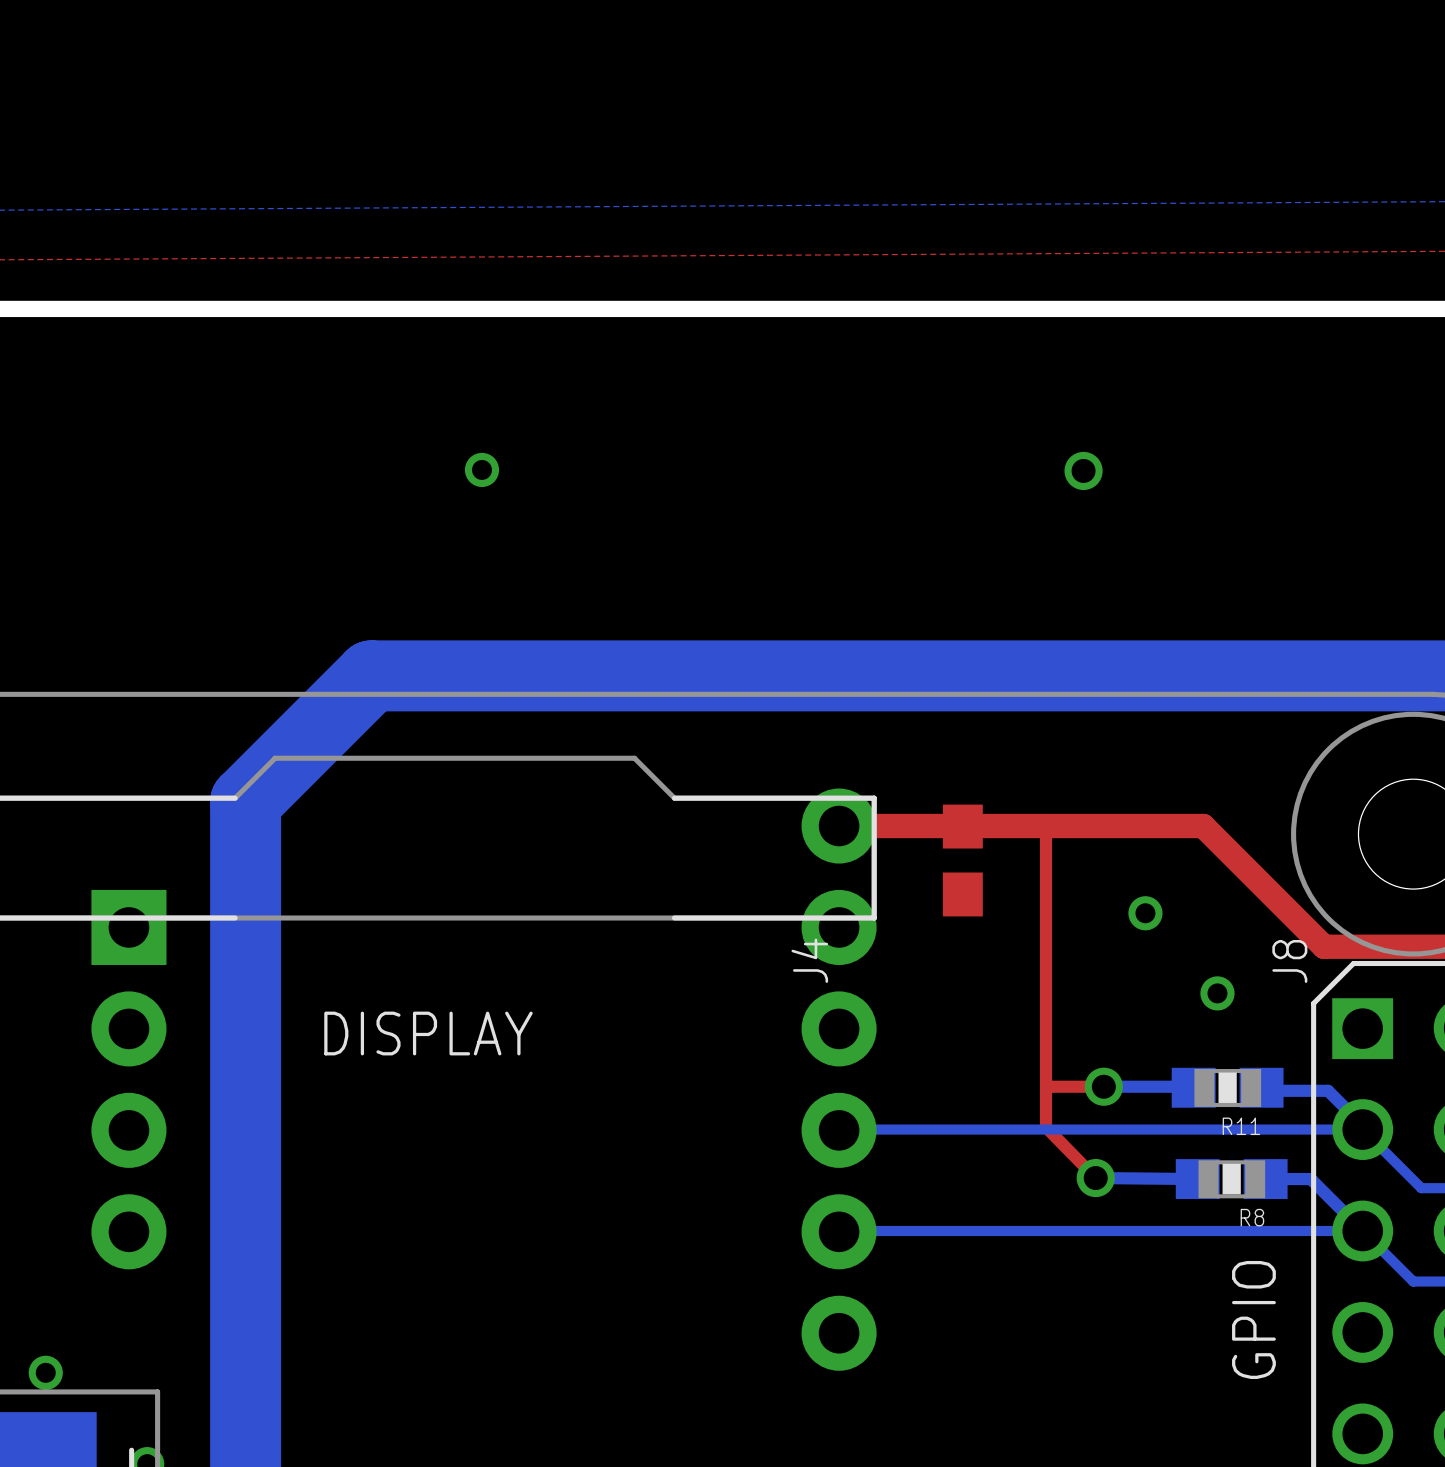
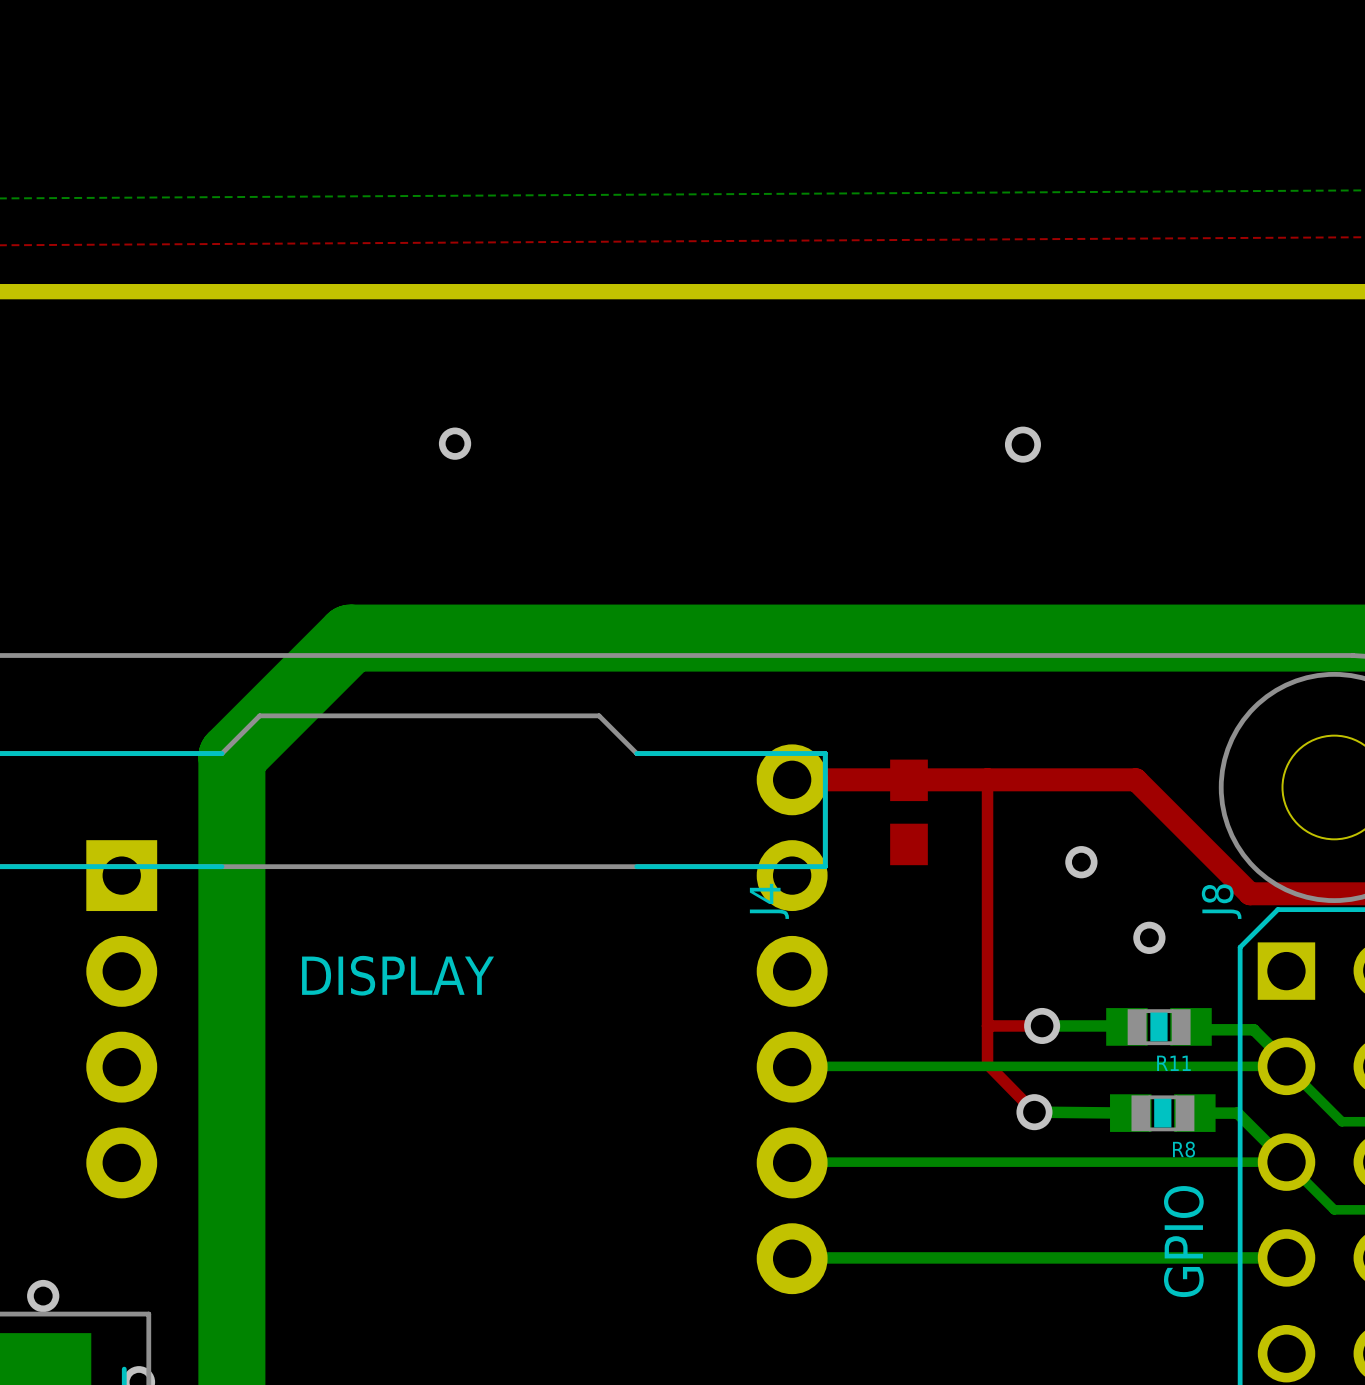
bottom track: none -> (1286, 1257) (792, 1258)

